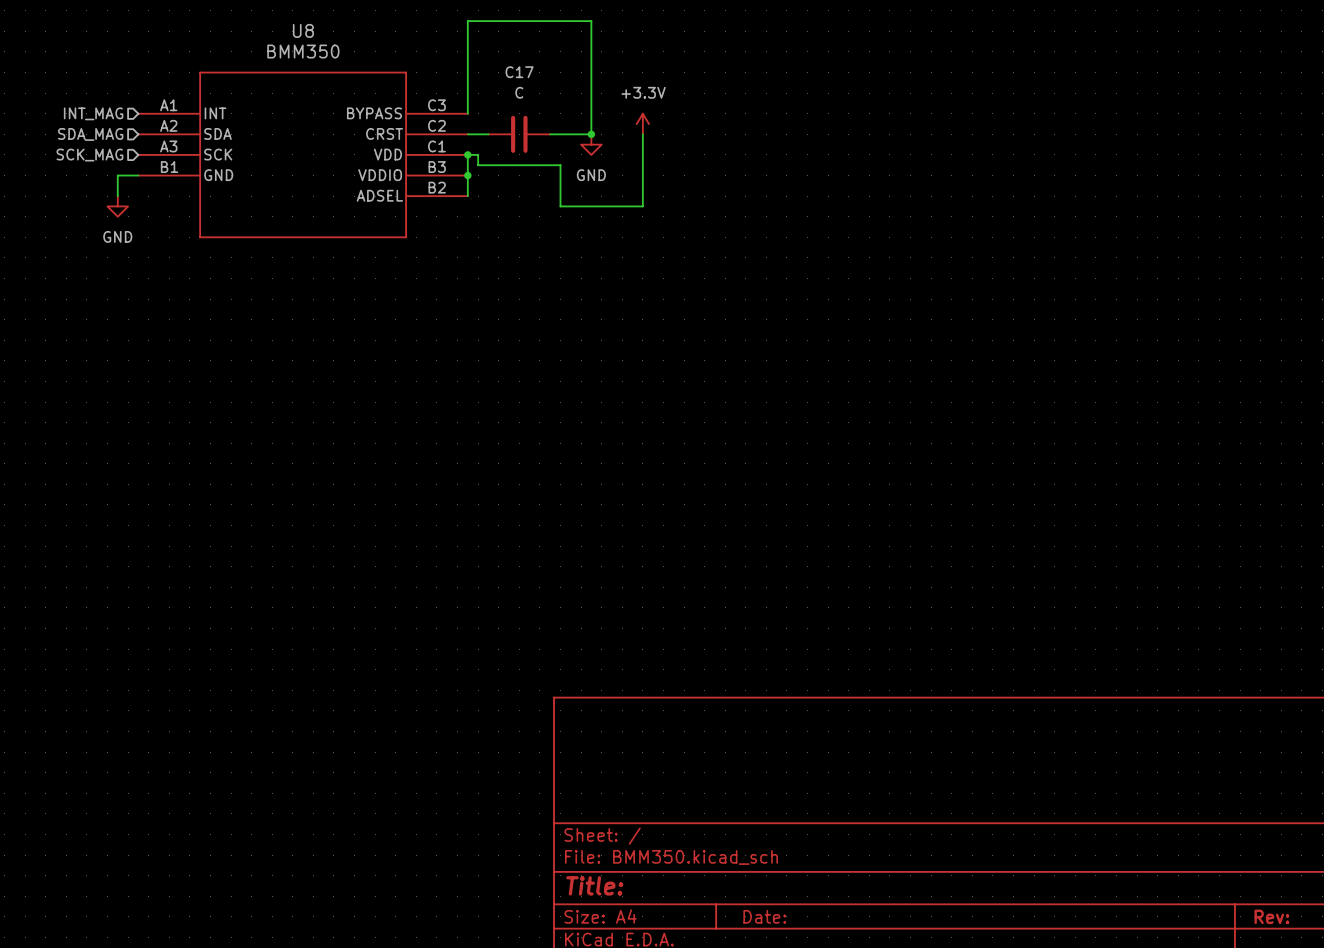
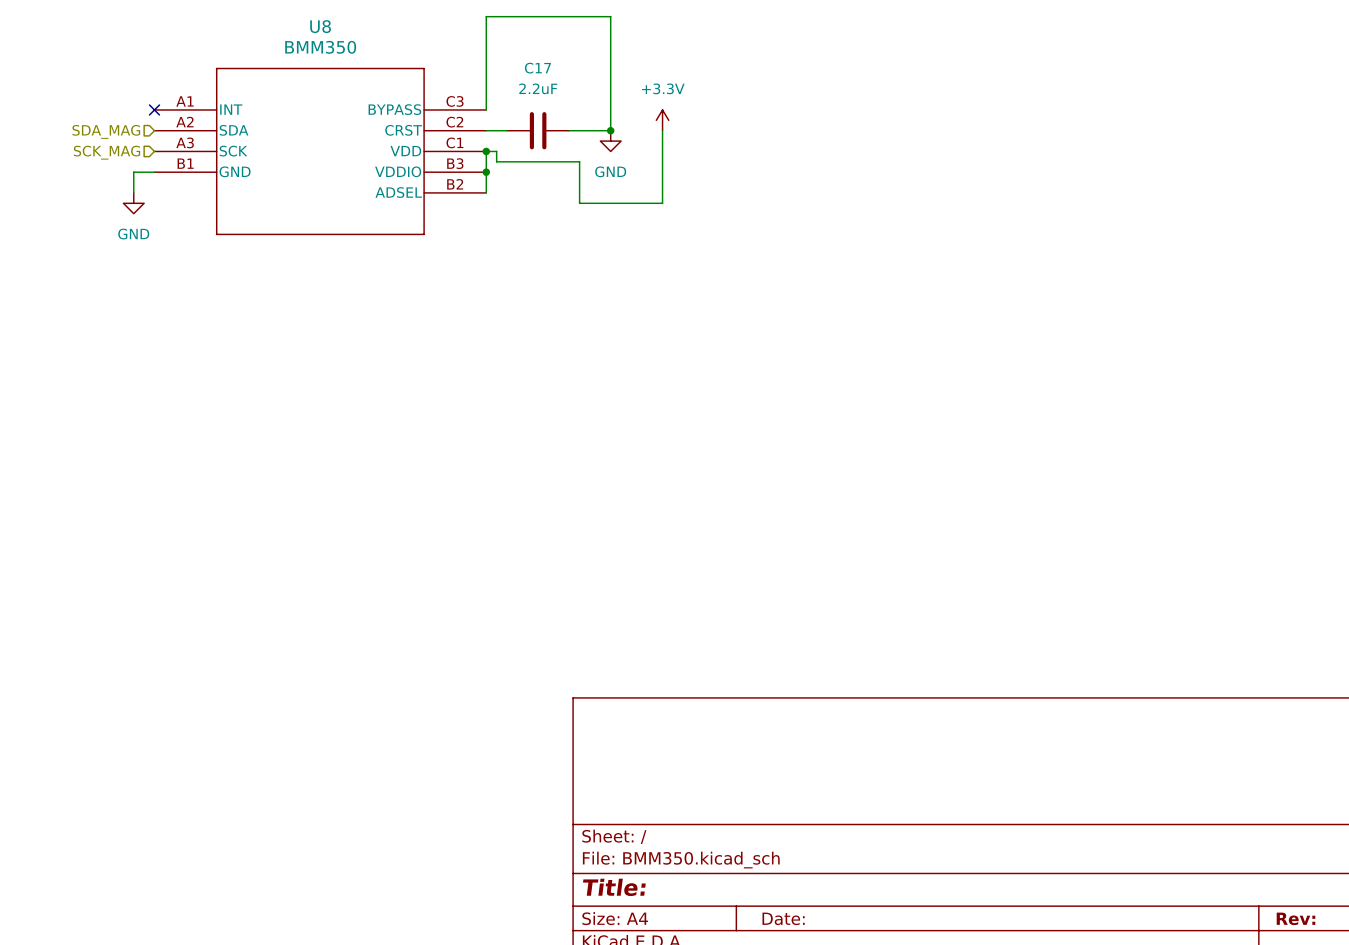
C17 value: C (519, 92) -> 2.2uF (538, 88)
hierarchical label: INT_MAG (93, 113) -> none
no-connect mark: none -> (154, 109)

